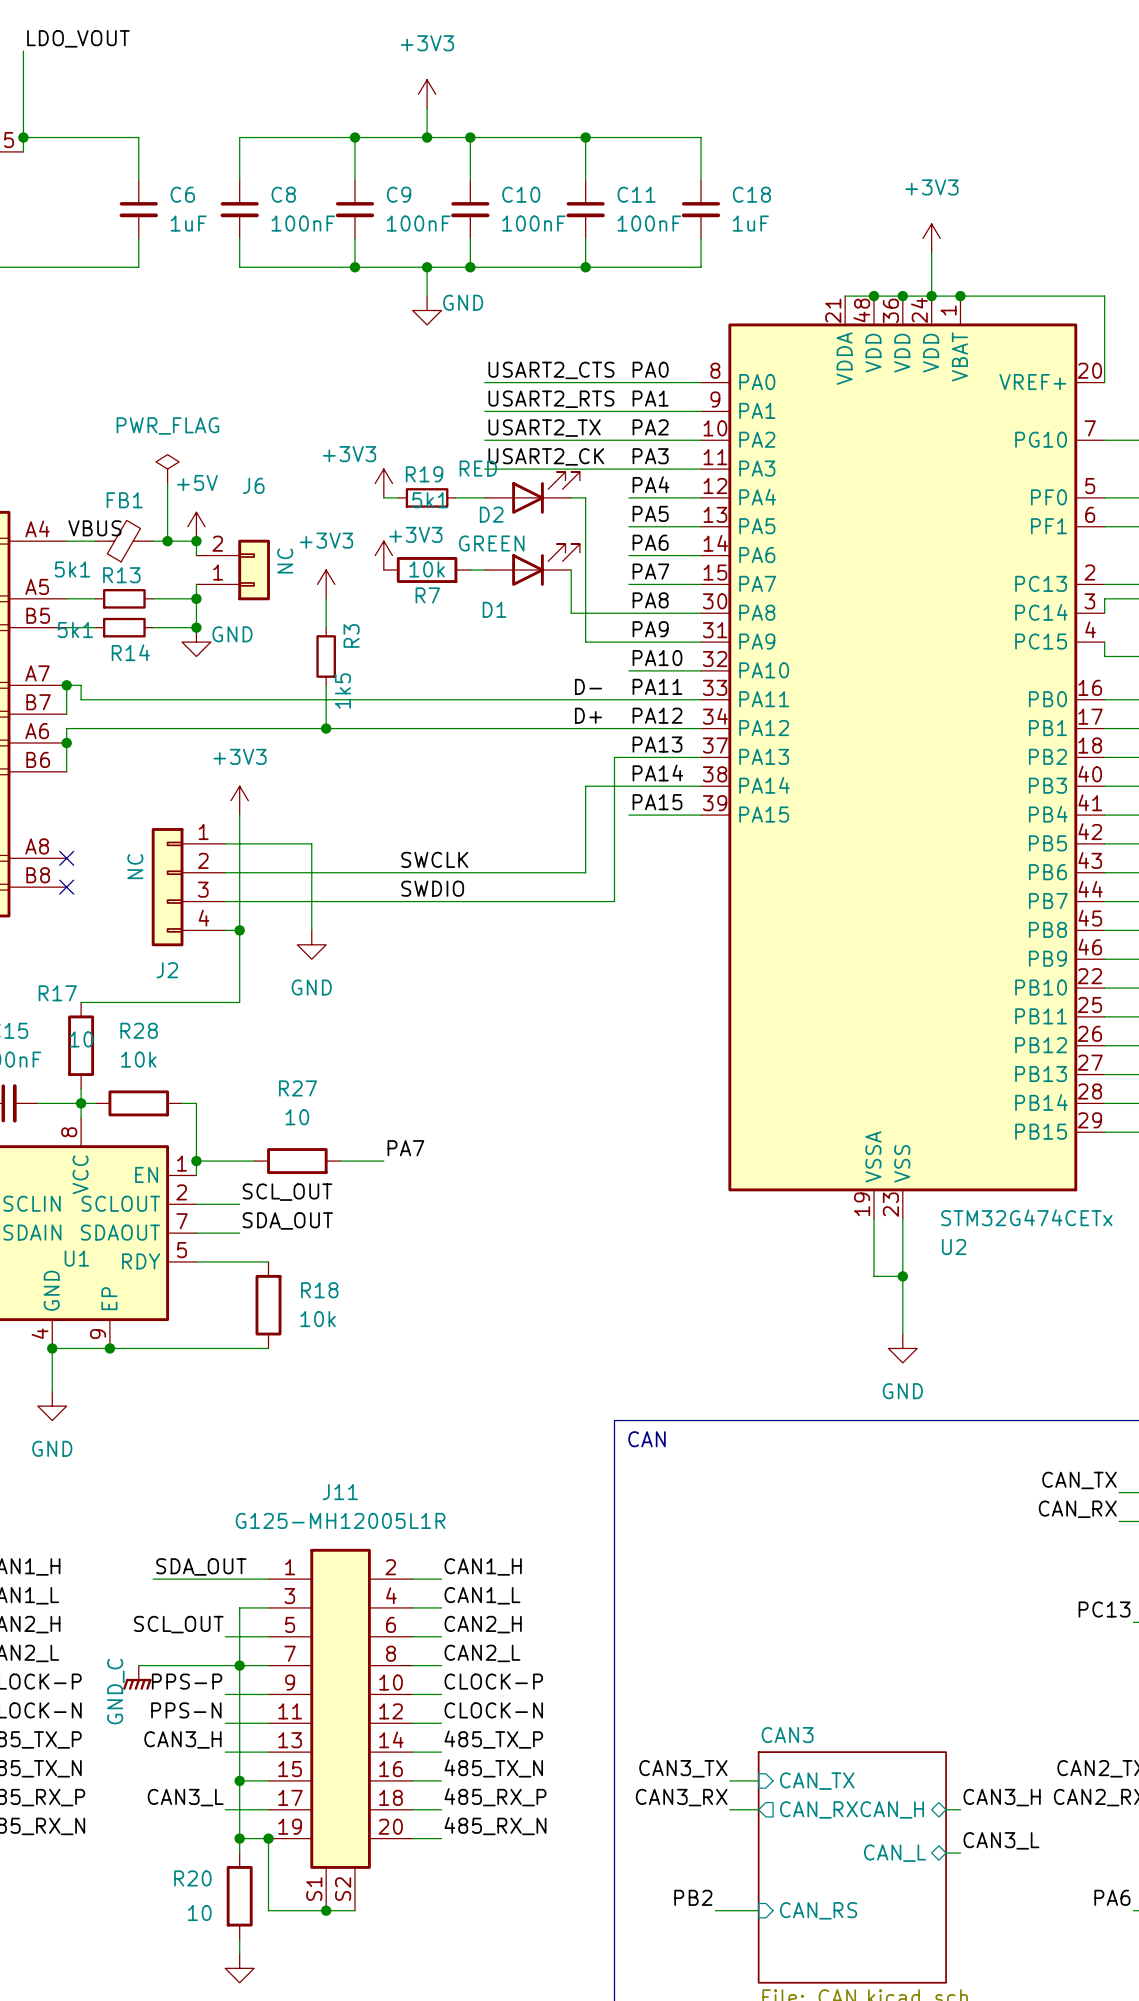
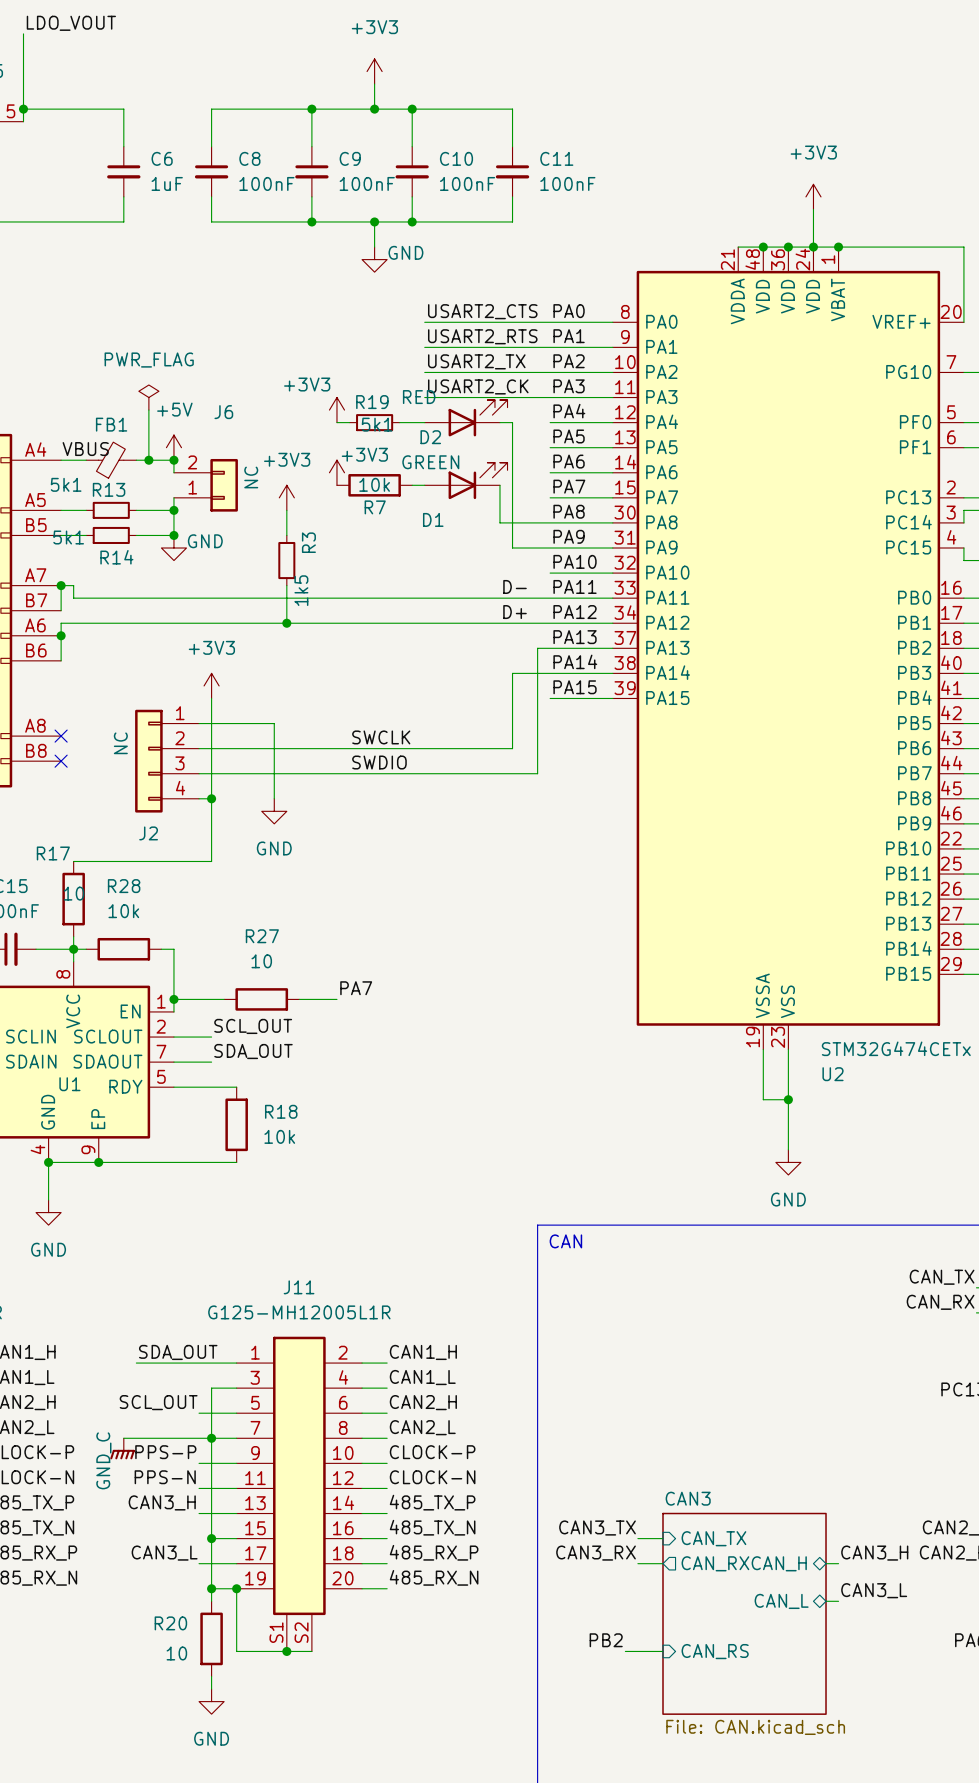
wire: (585, 137) (700, 137) (700, 180) -> none
junction: (585, 137) -> none
C18: 1uF (700, 209) -> none
wire: (700, 238) (700, 267) (585, 267) -> none
junction: (585, 267) -> none

